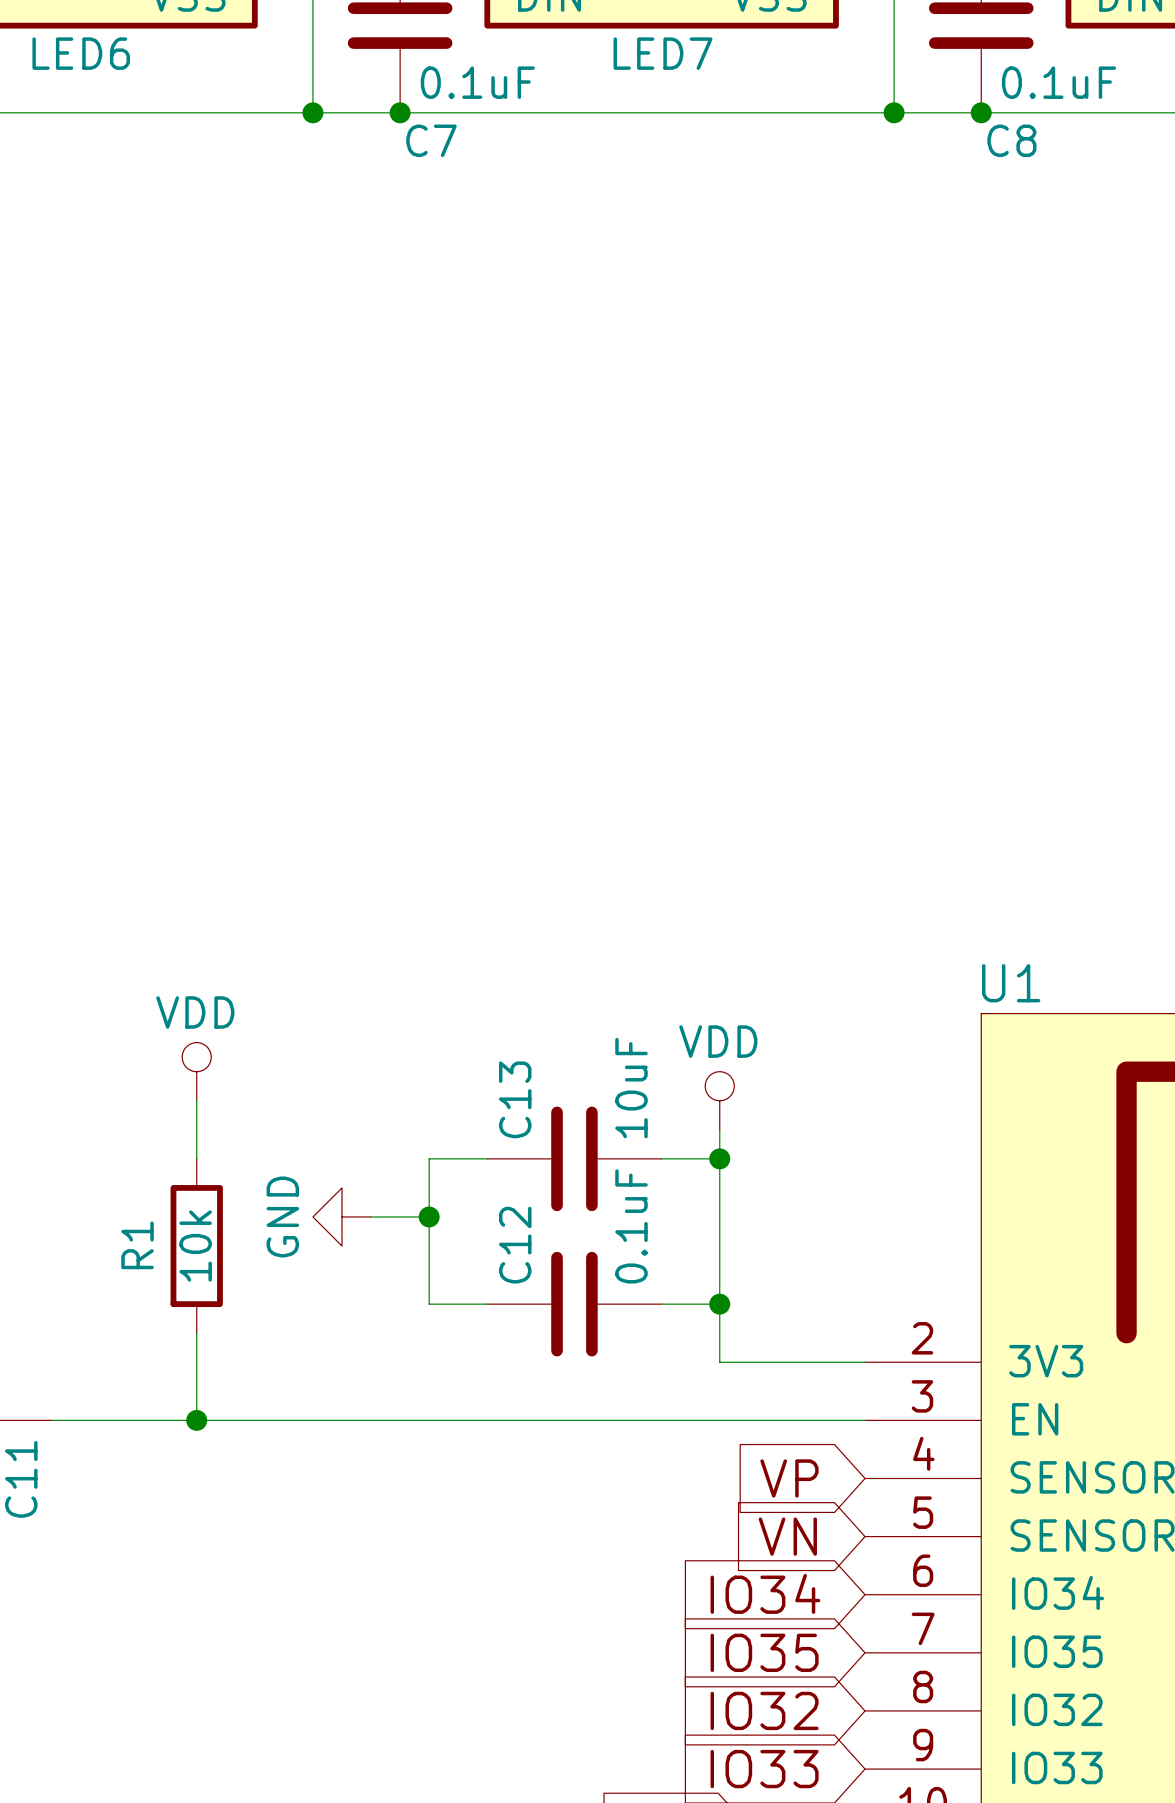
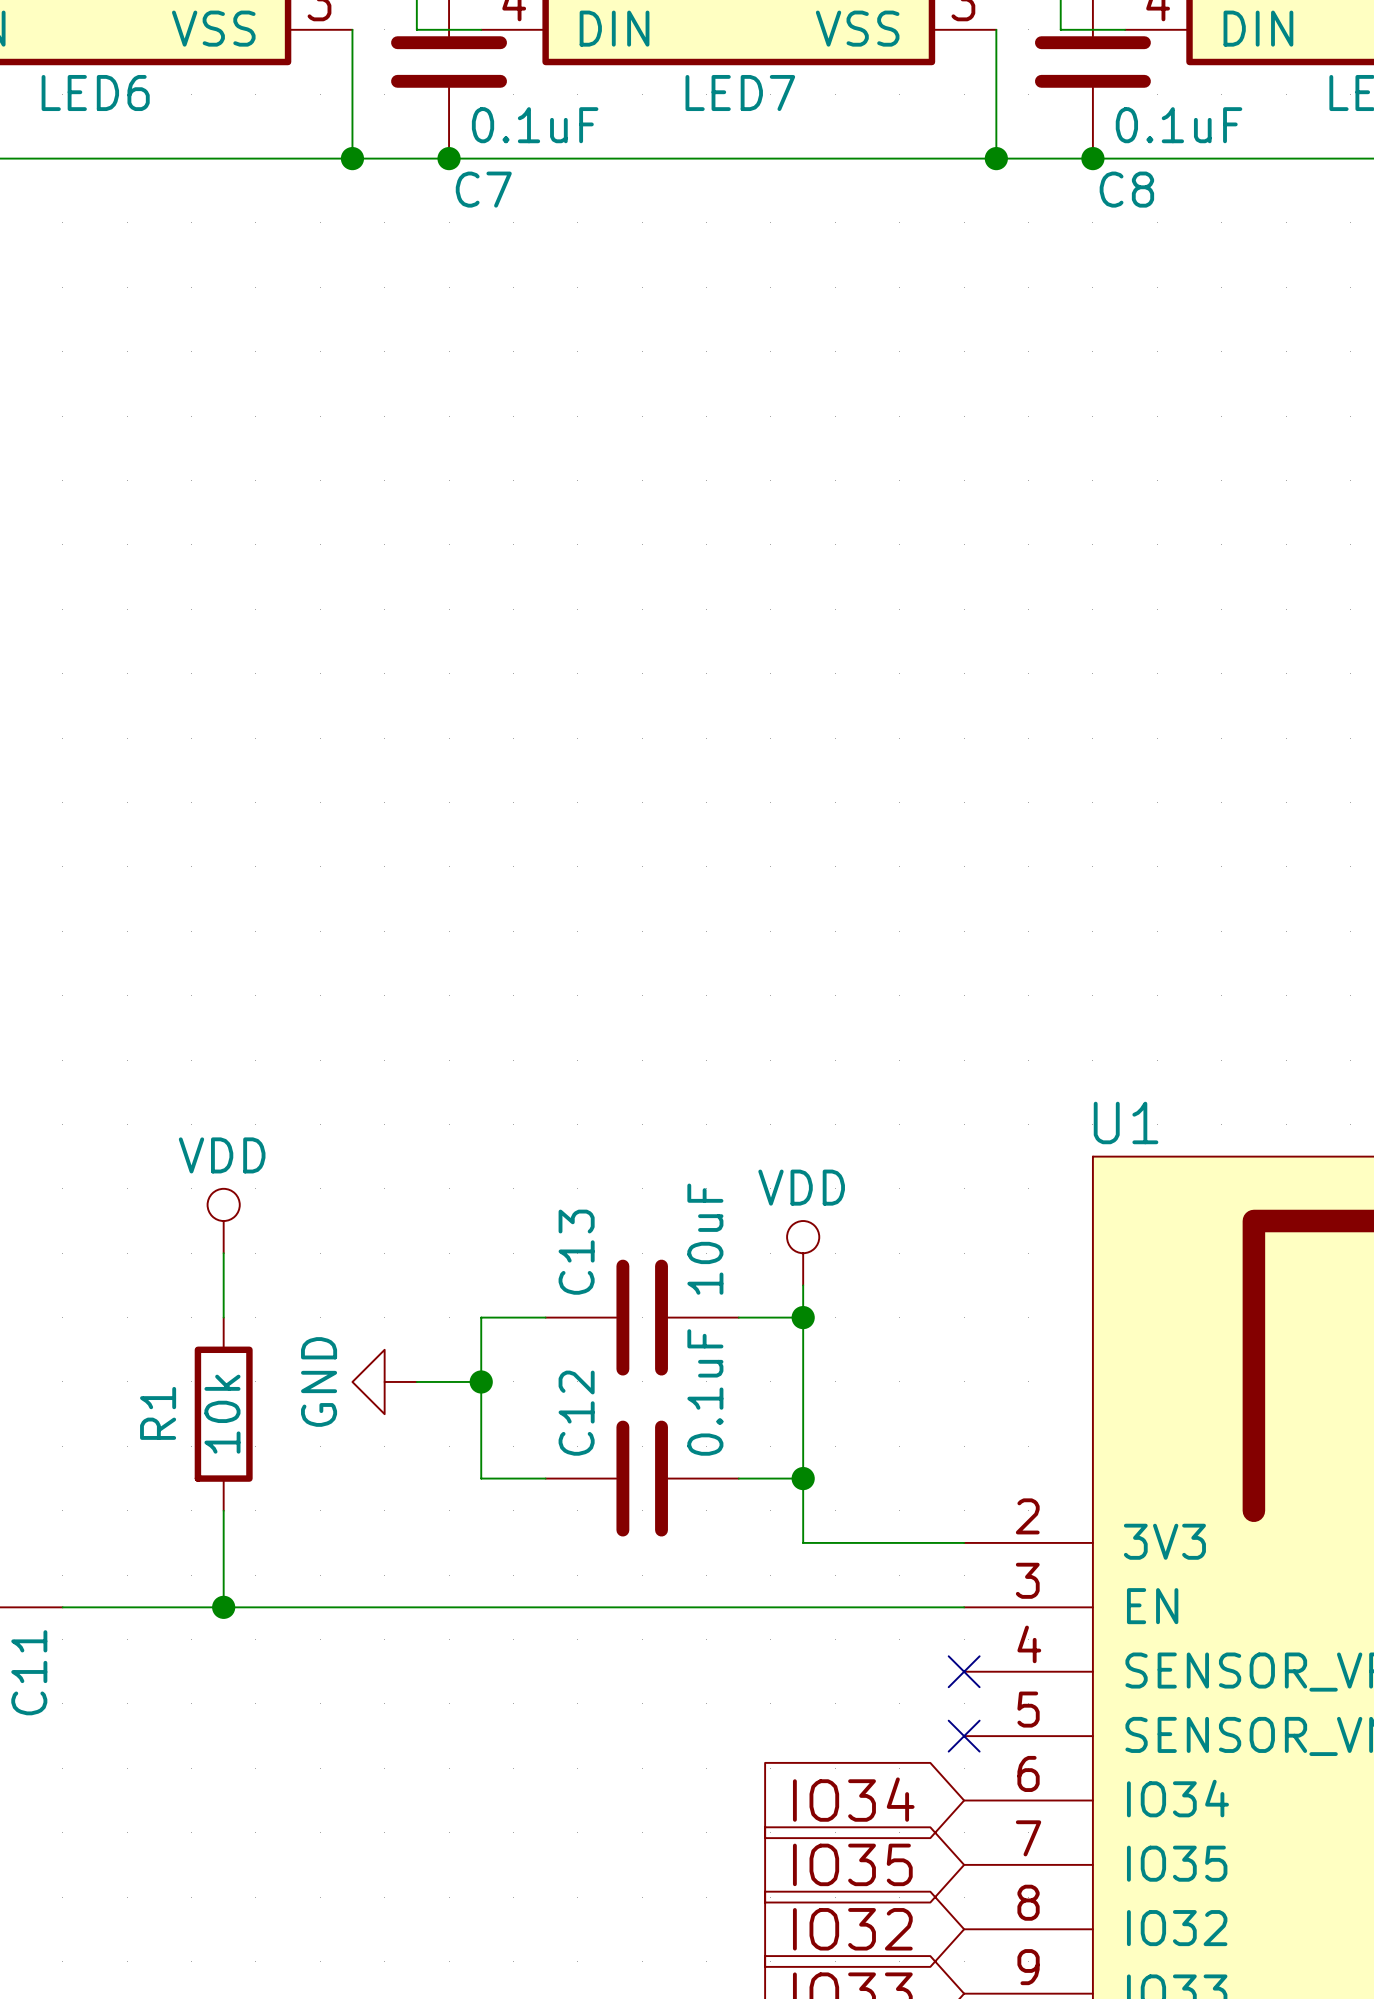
global label: VP (789, 1478) -> none
no-connect mark: none -> (964, 1671)
global label: VN (787, 1536) -> none
no-connect mark: none -> (964, 1736)

